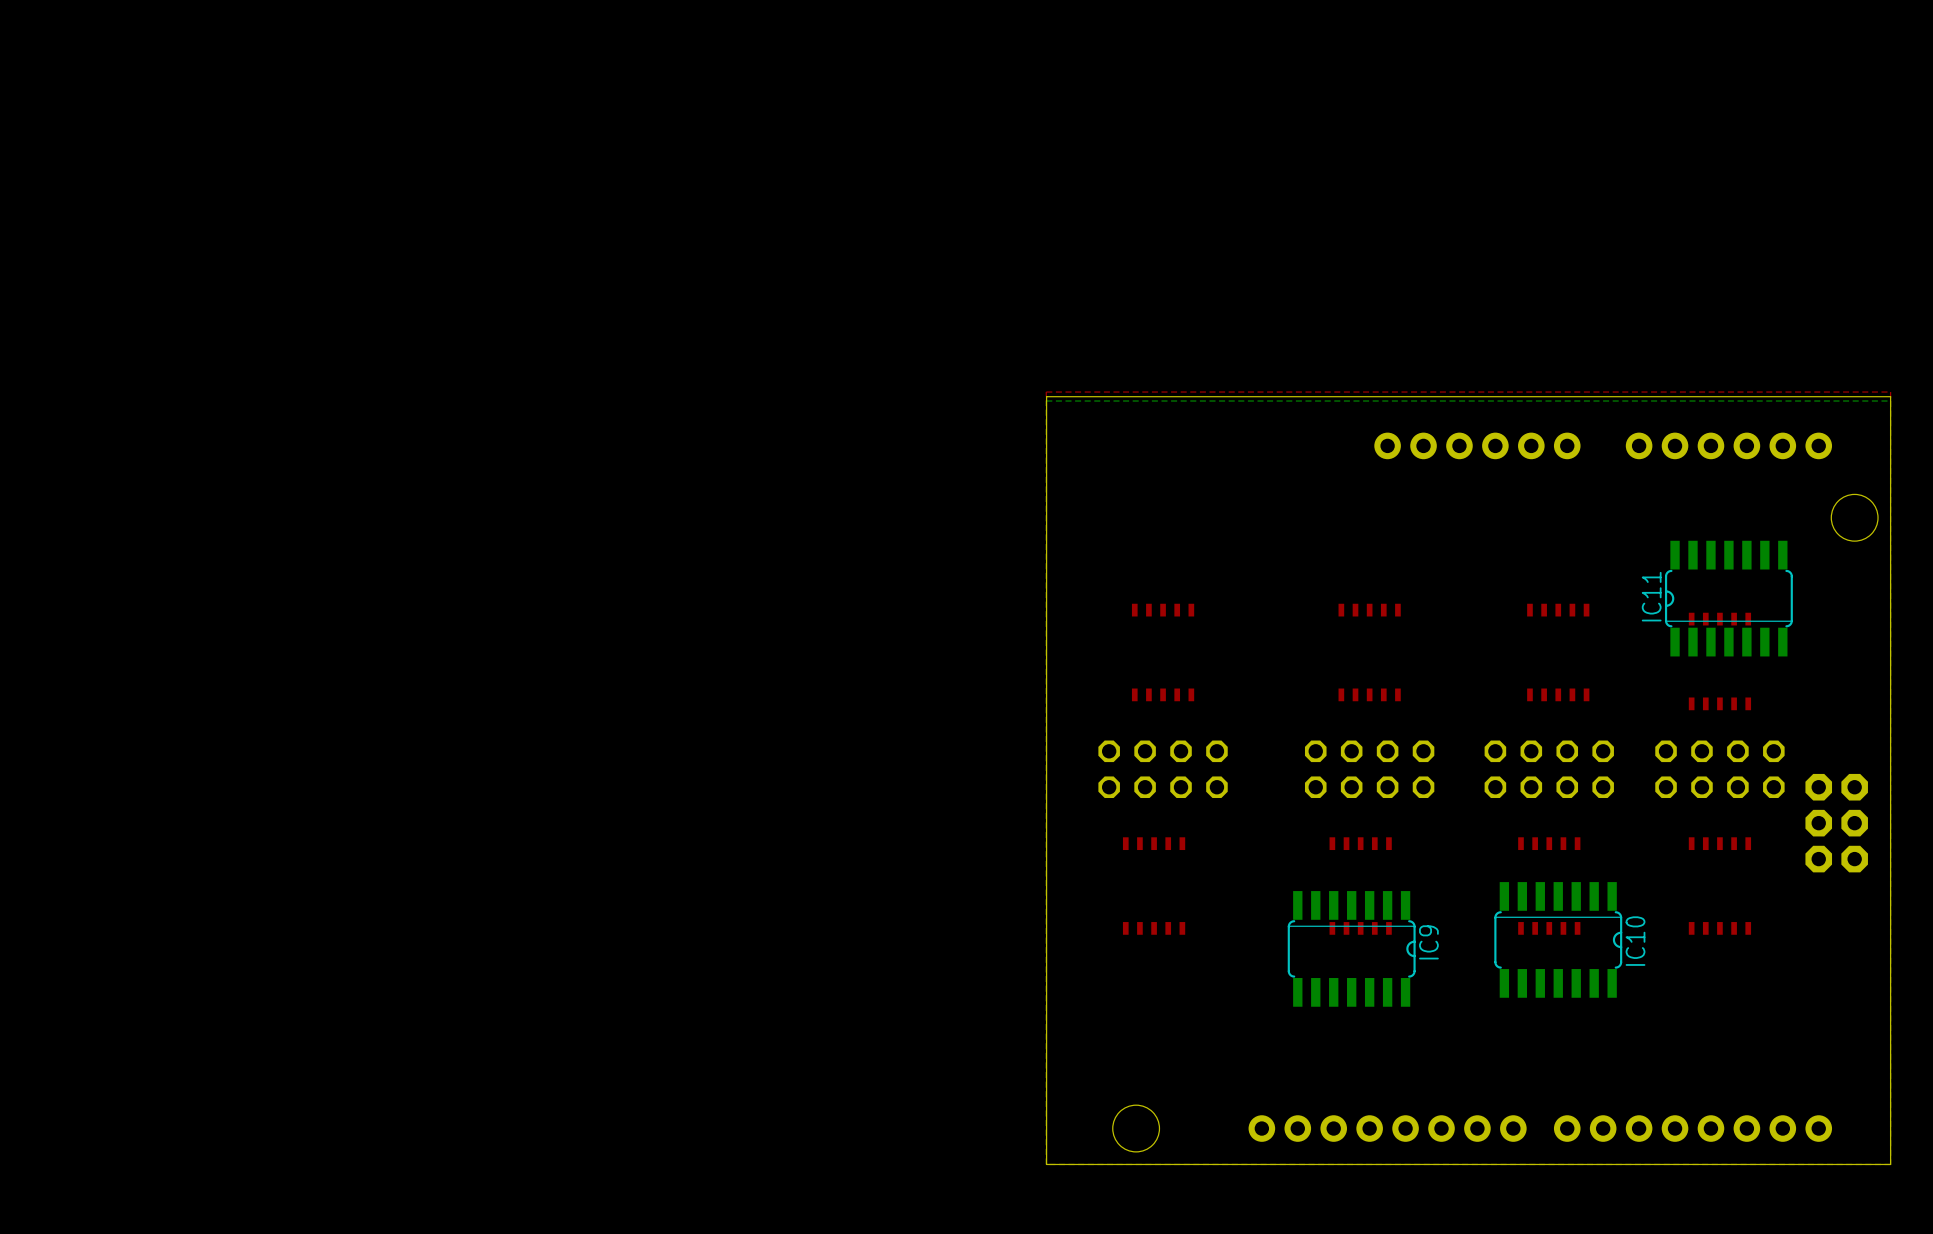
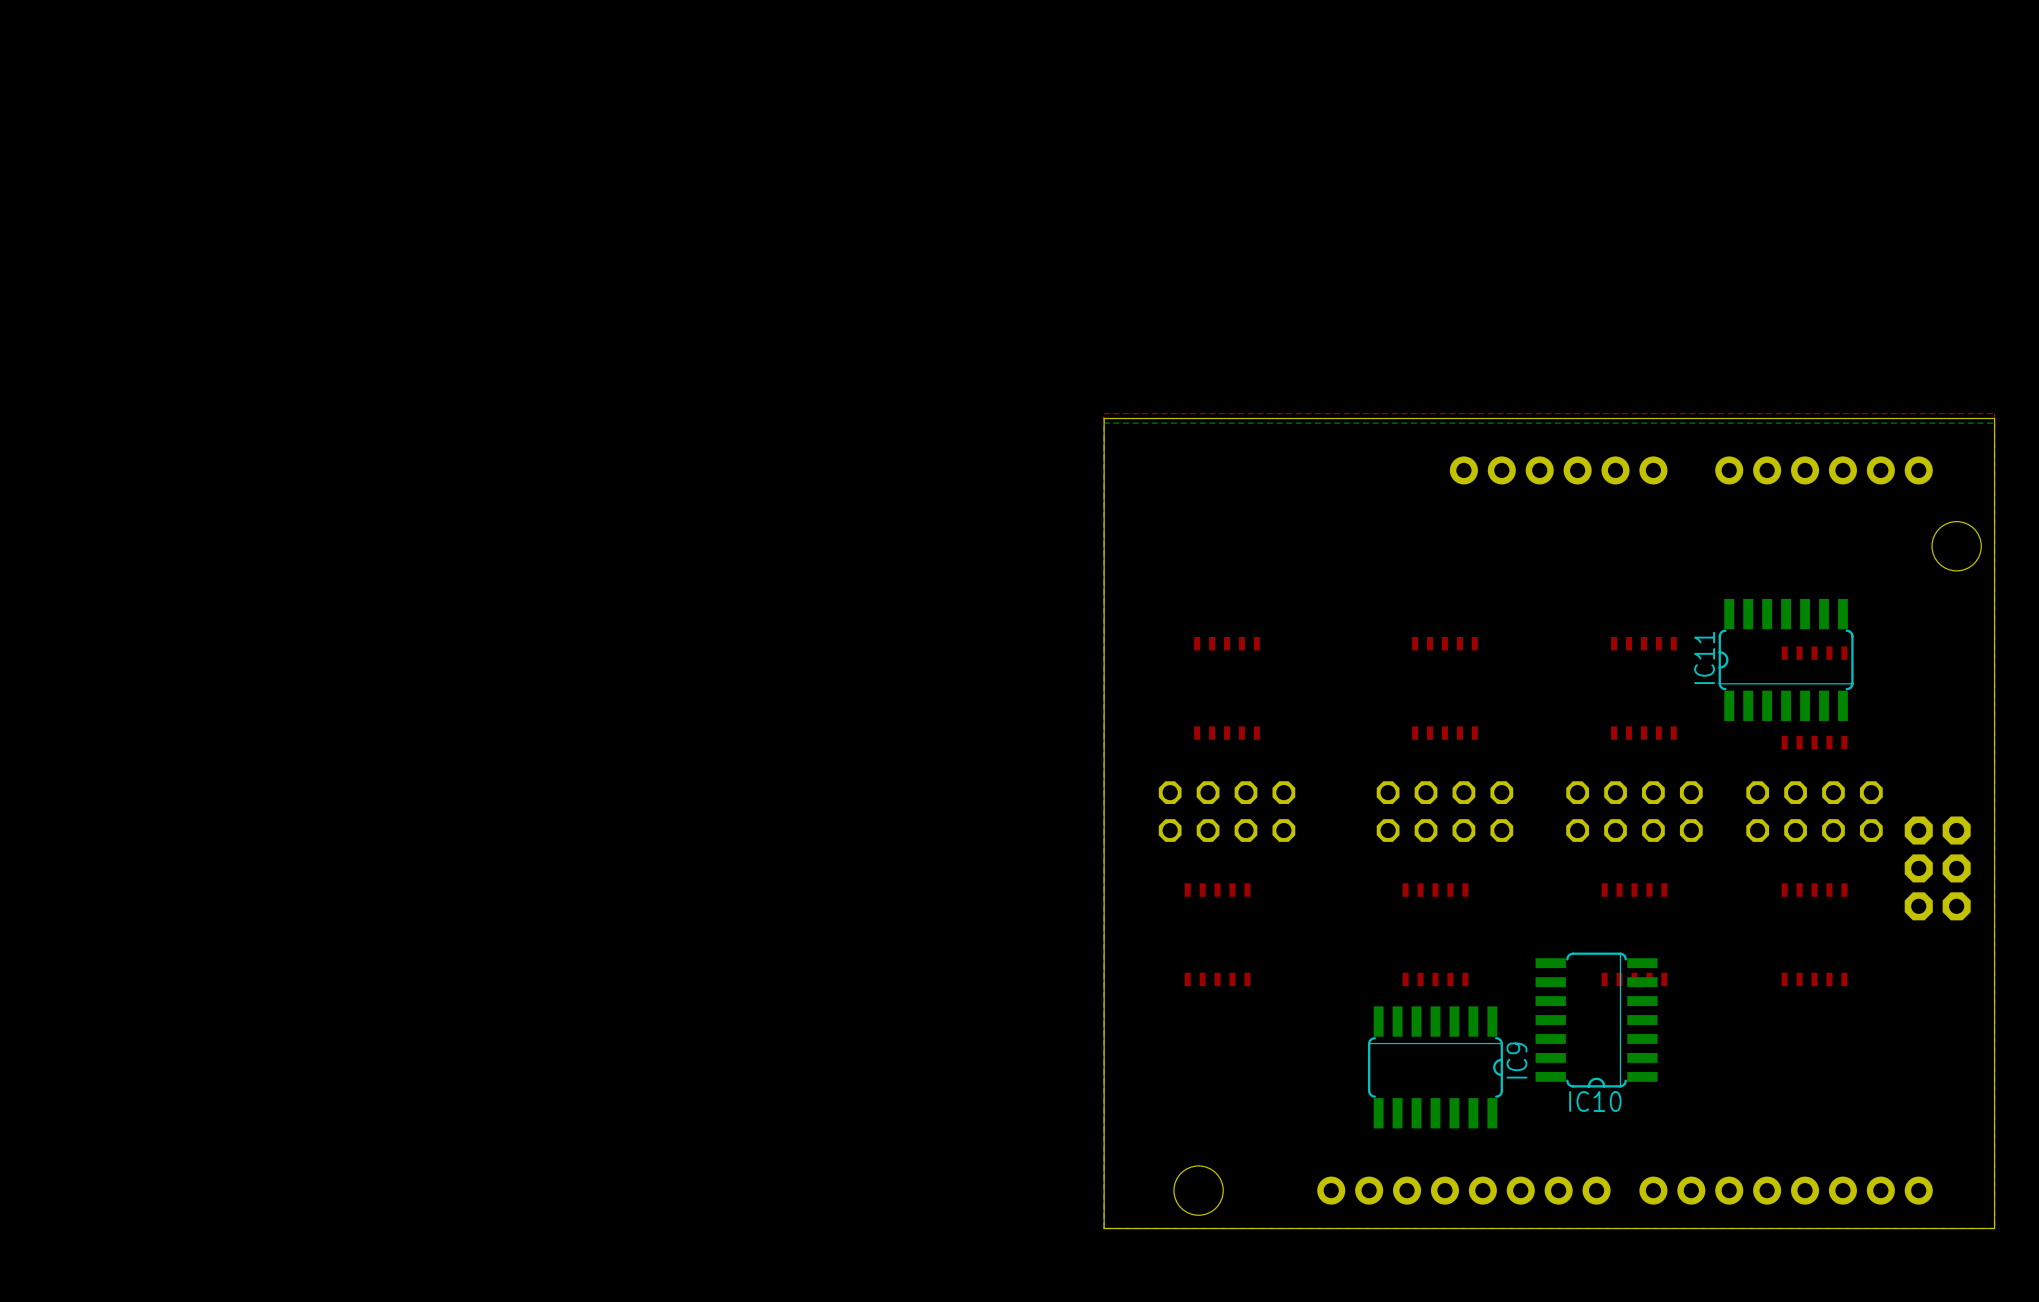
IC11 position: (1728, 598) -> (1786, 659)
IC10 rotation: 0° (1558, 939) -> 90° clockwise (1596, 1020)
IC9 position: (1351, 948) -> (1435, 1067)

